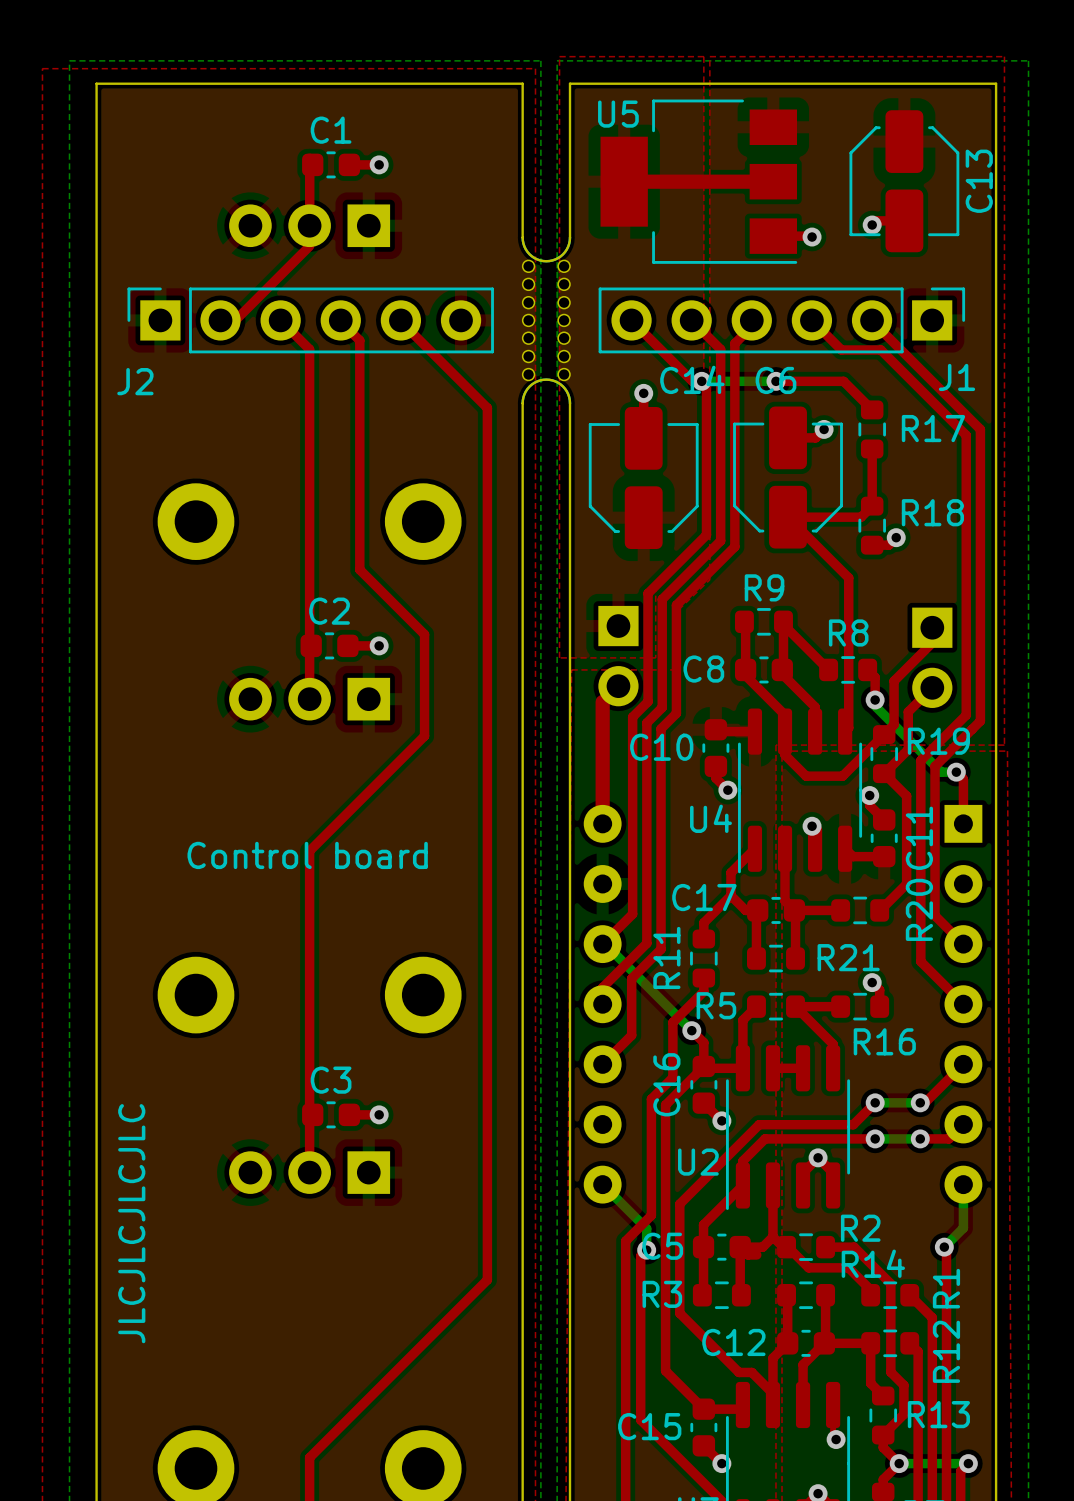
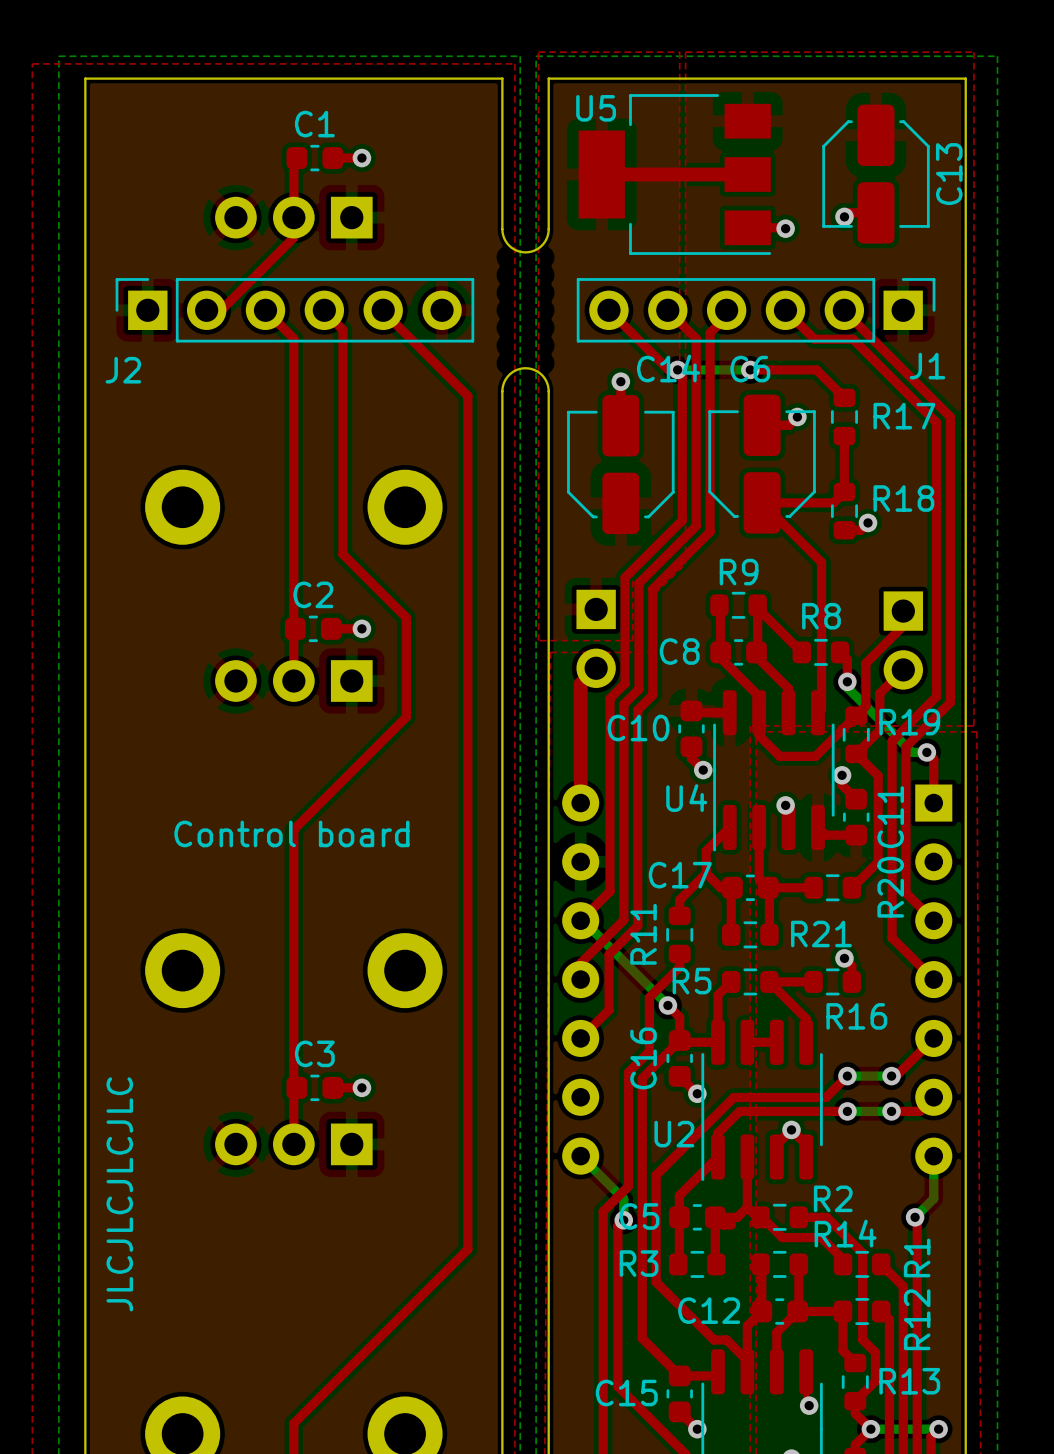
part: (546, 320) -> none

